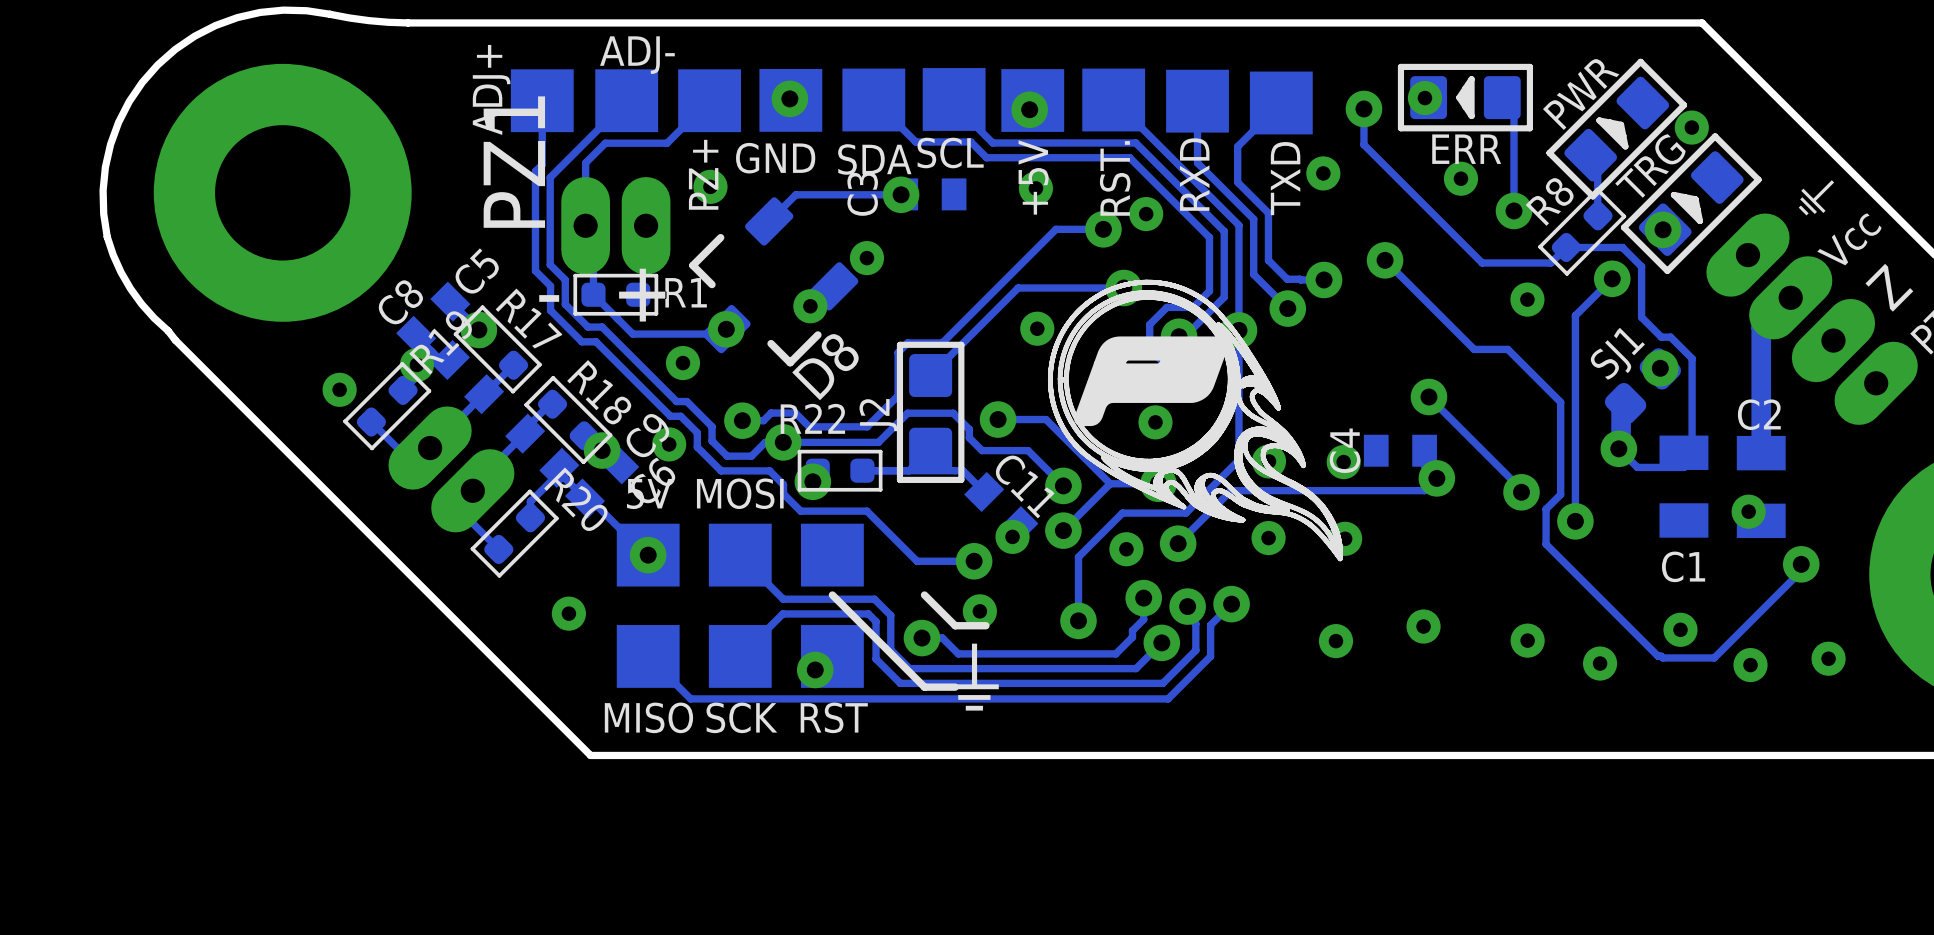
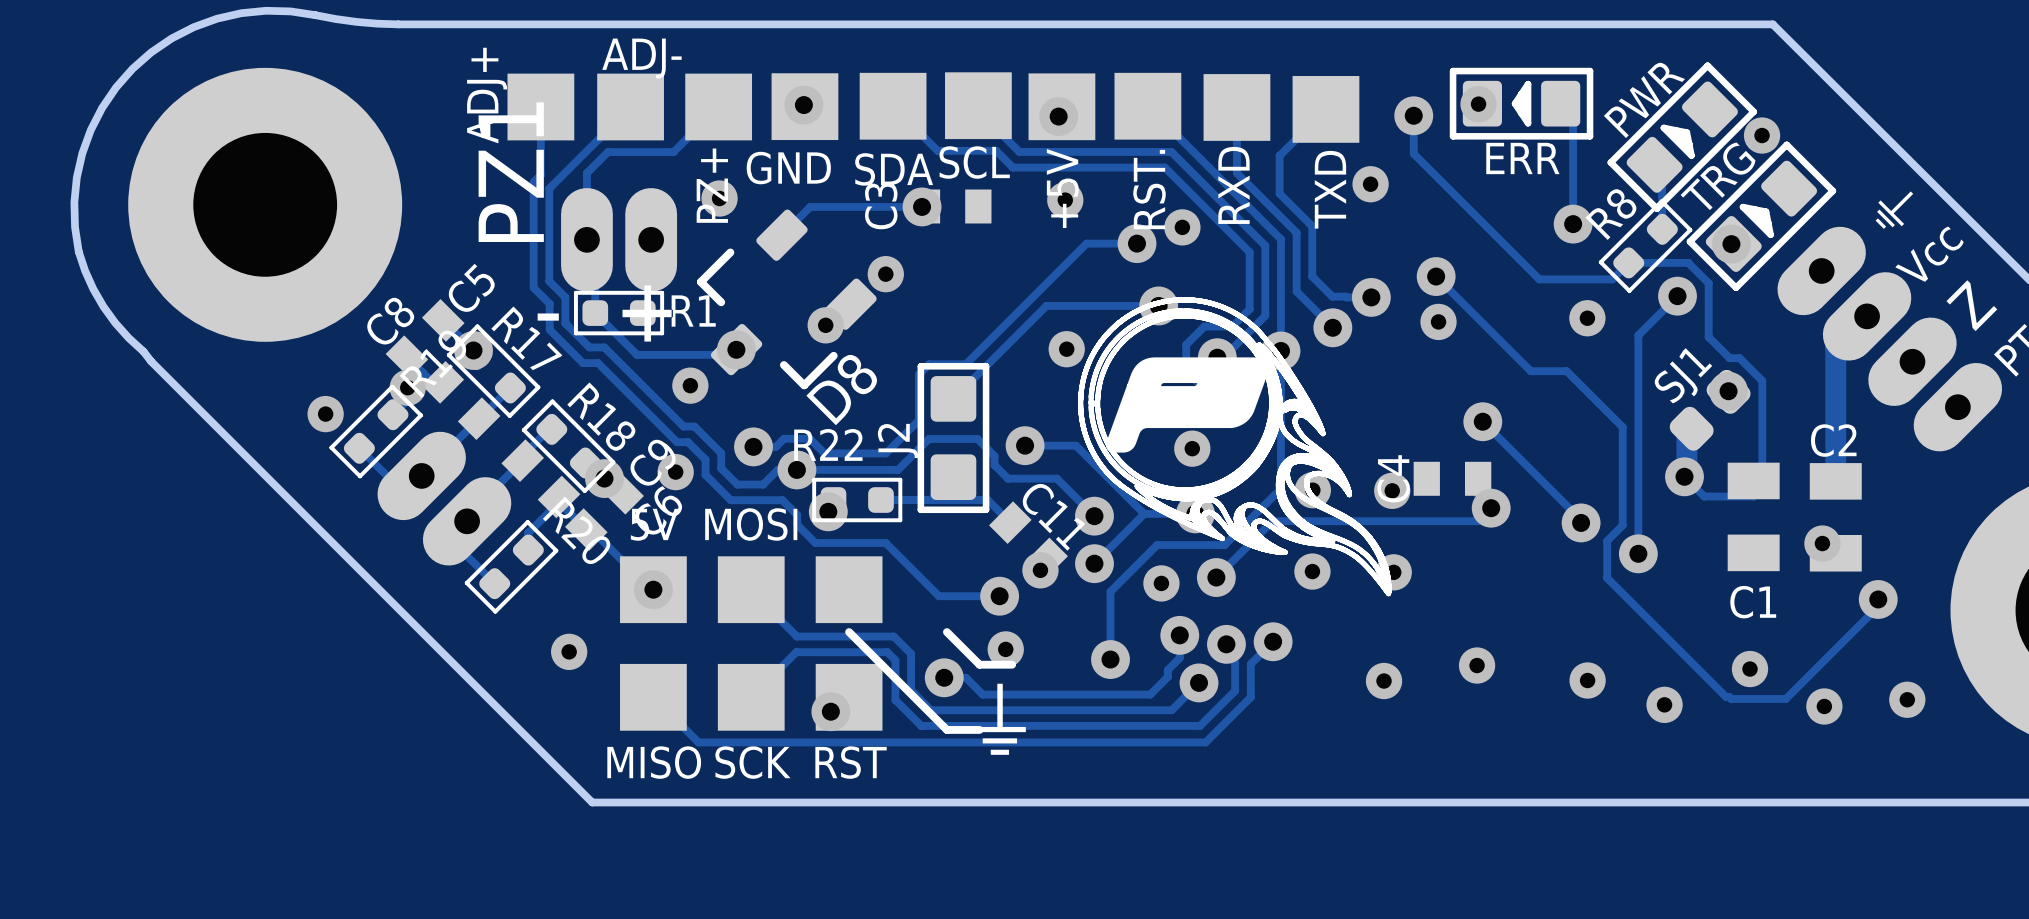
via position: (1460, 178) -> (1438, 321)

